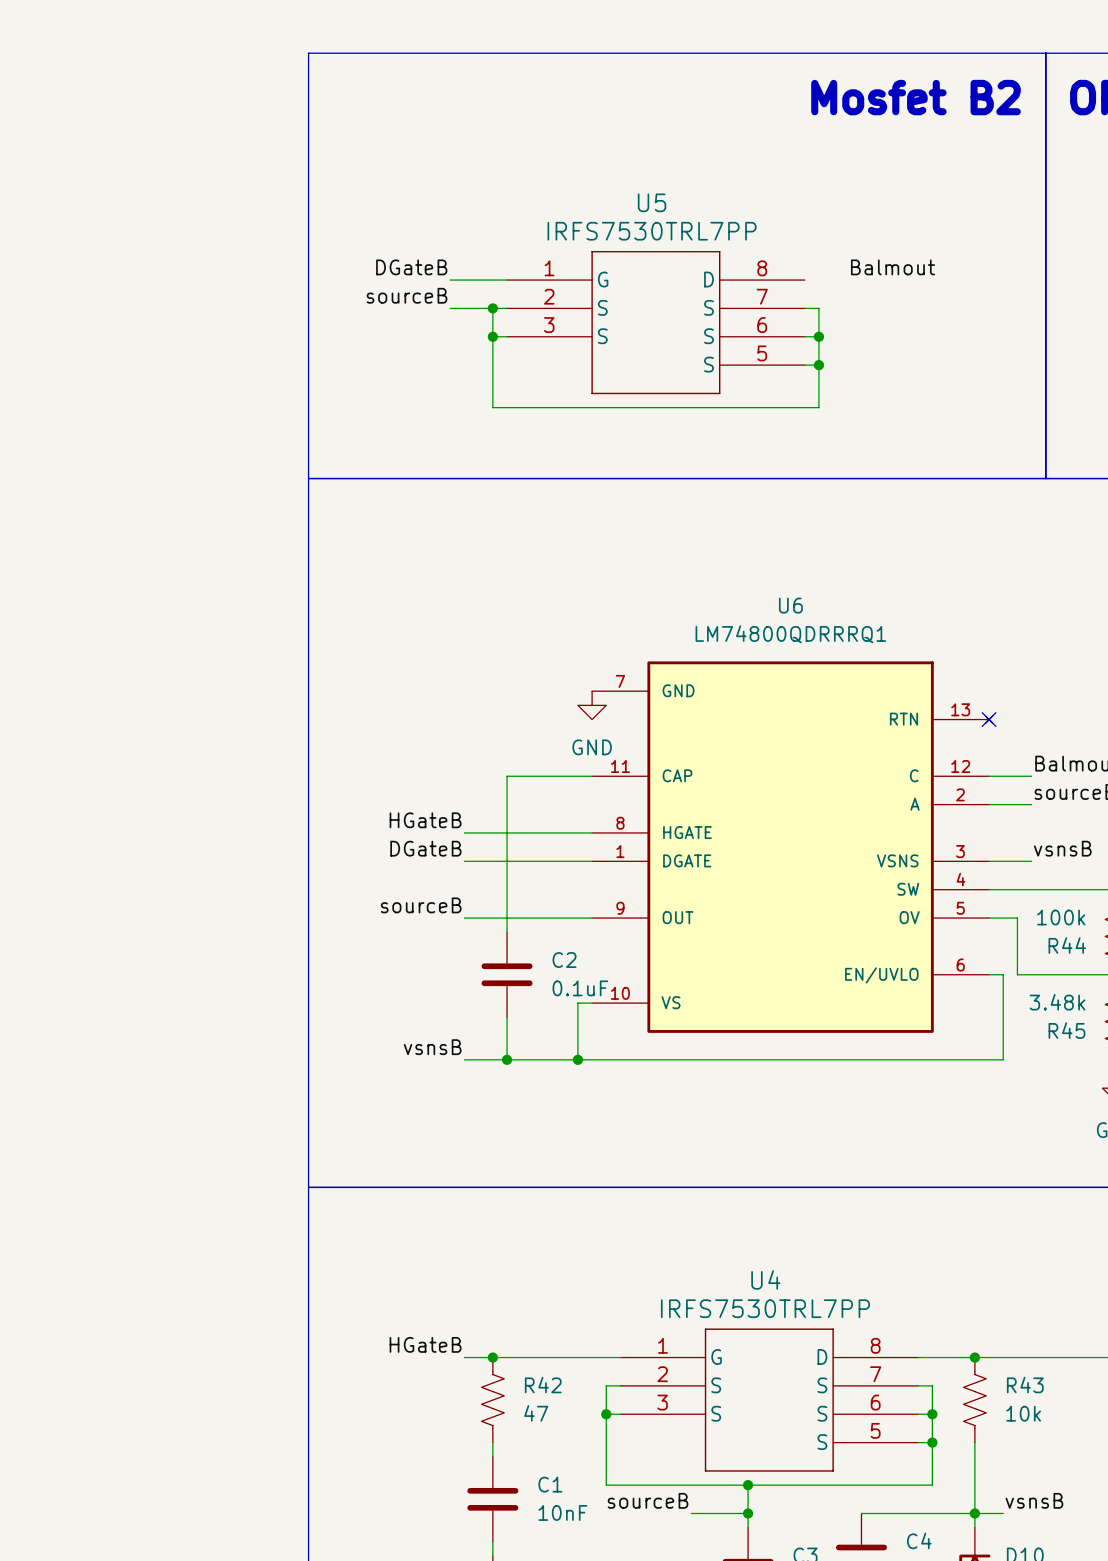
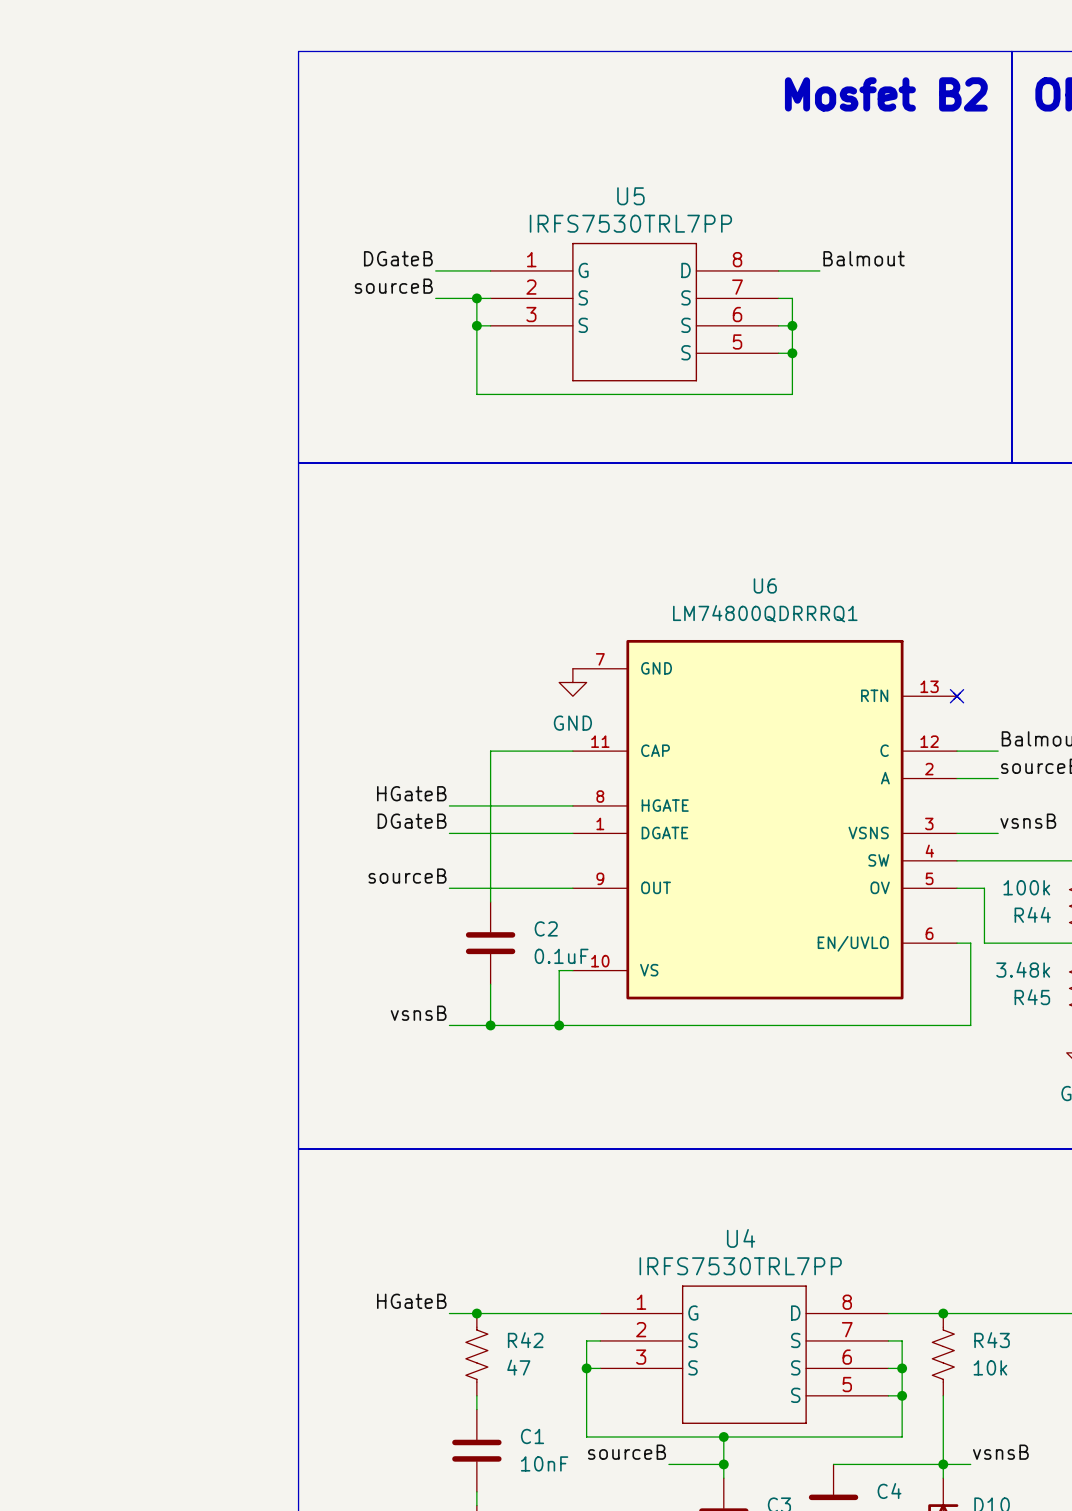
wire: none -> (778, 270) (819, 270)

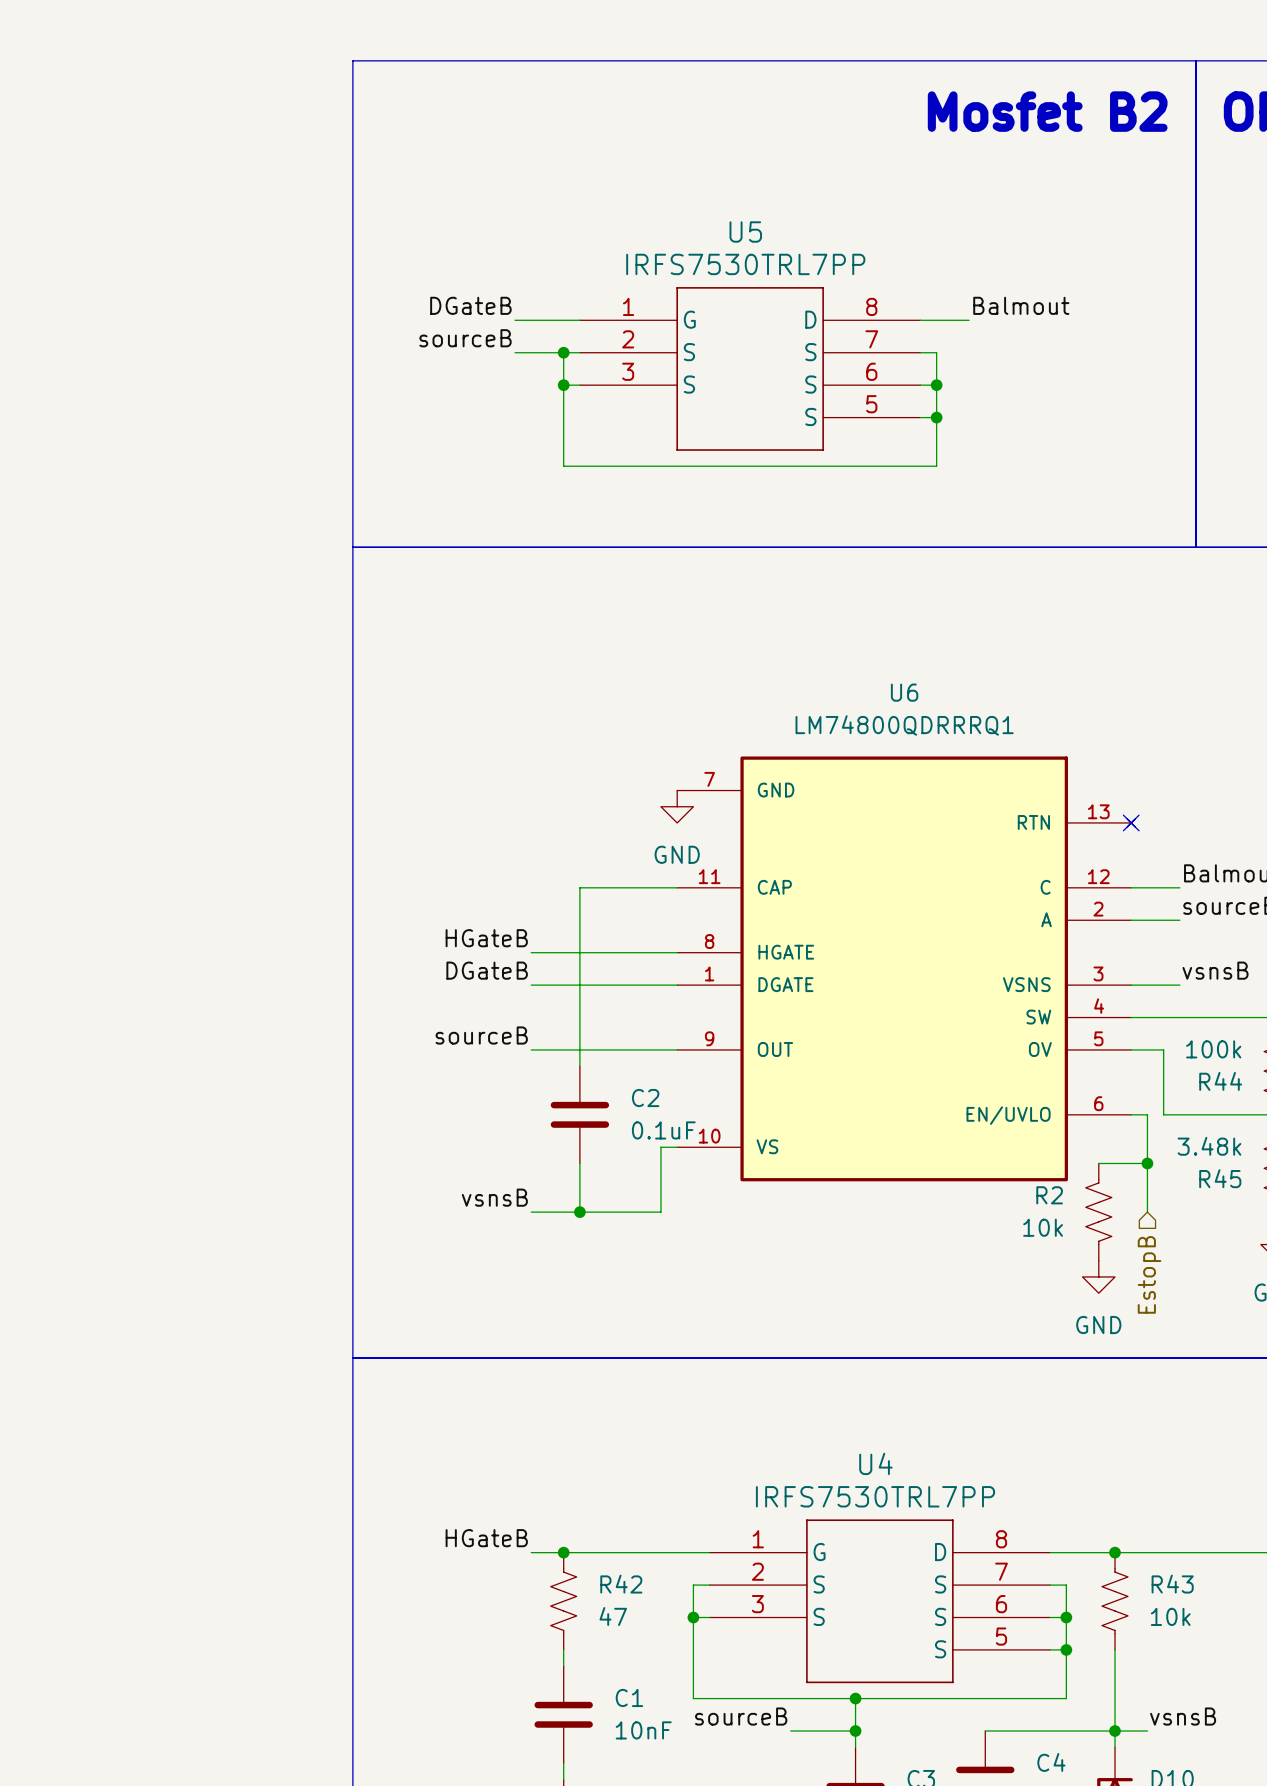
wire: none -> (1098, 1163) (1147, 1163)
junction: none -> (1147, 1163)
wire: (559, 1025) (970, 1025) -> none
junction: (559, 1025) -> none
R2: none -> 10k (1098, 1212)
hierarchical label: none -> EstopB (1149, 1274)
power symbol: none -> GND (1098, 1276)

